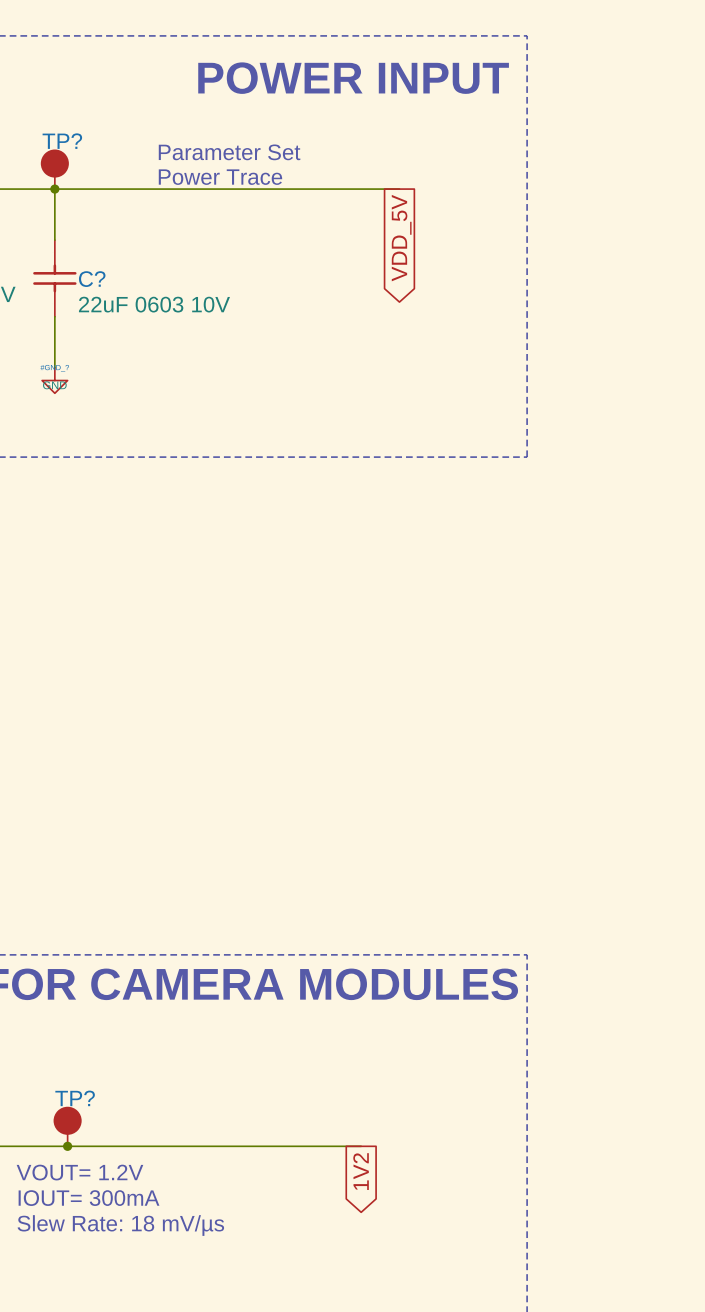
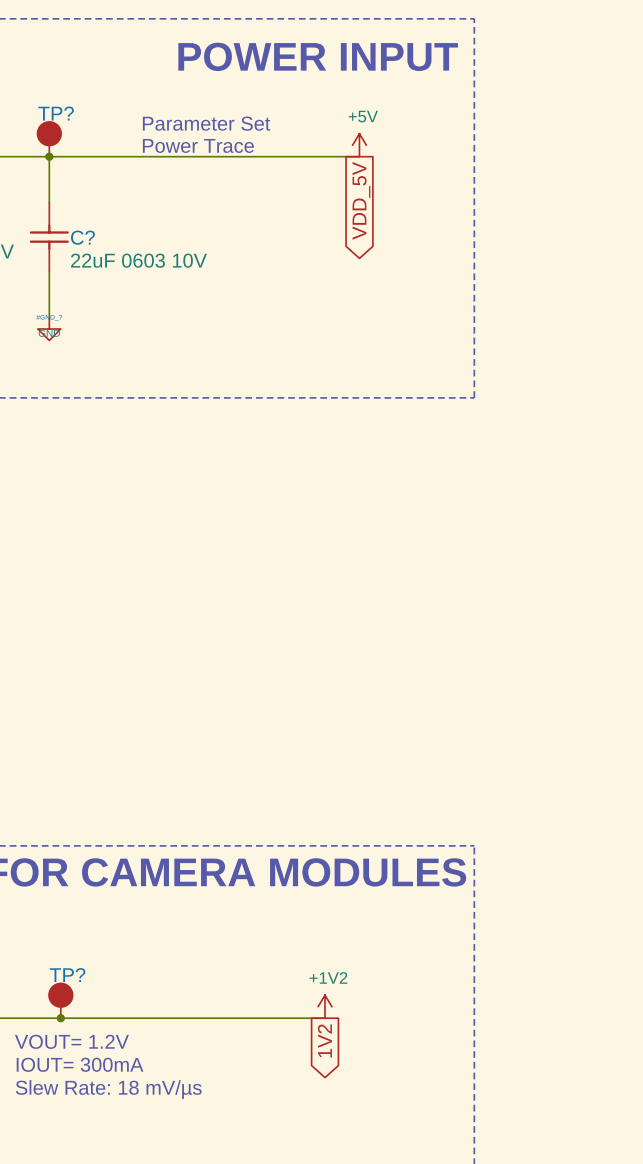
power symbol: none -> +5V (359, 145)
power symbol: none -> +1V2 (325, 1006)

